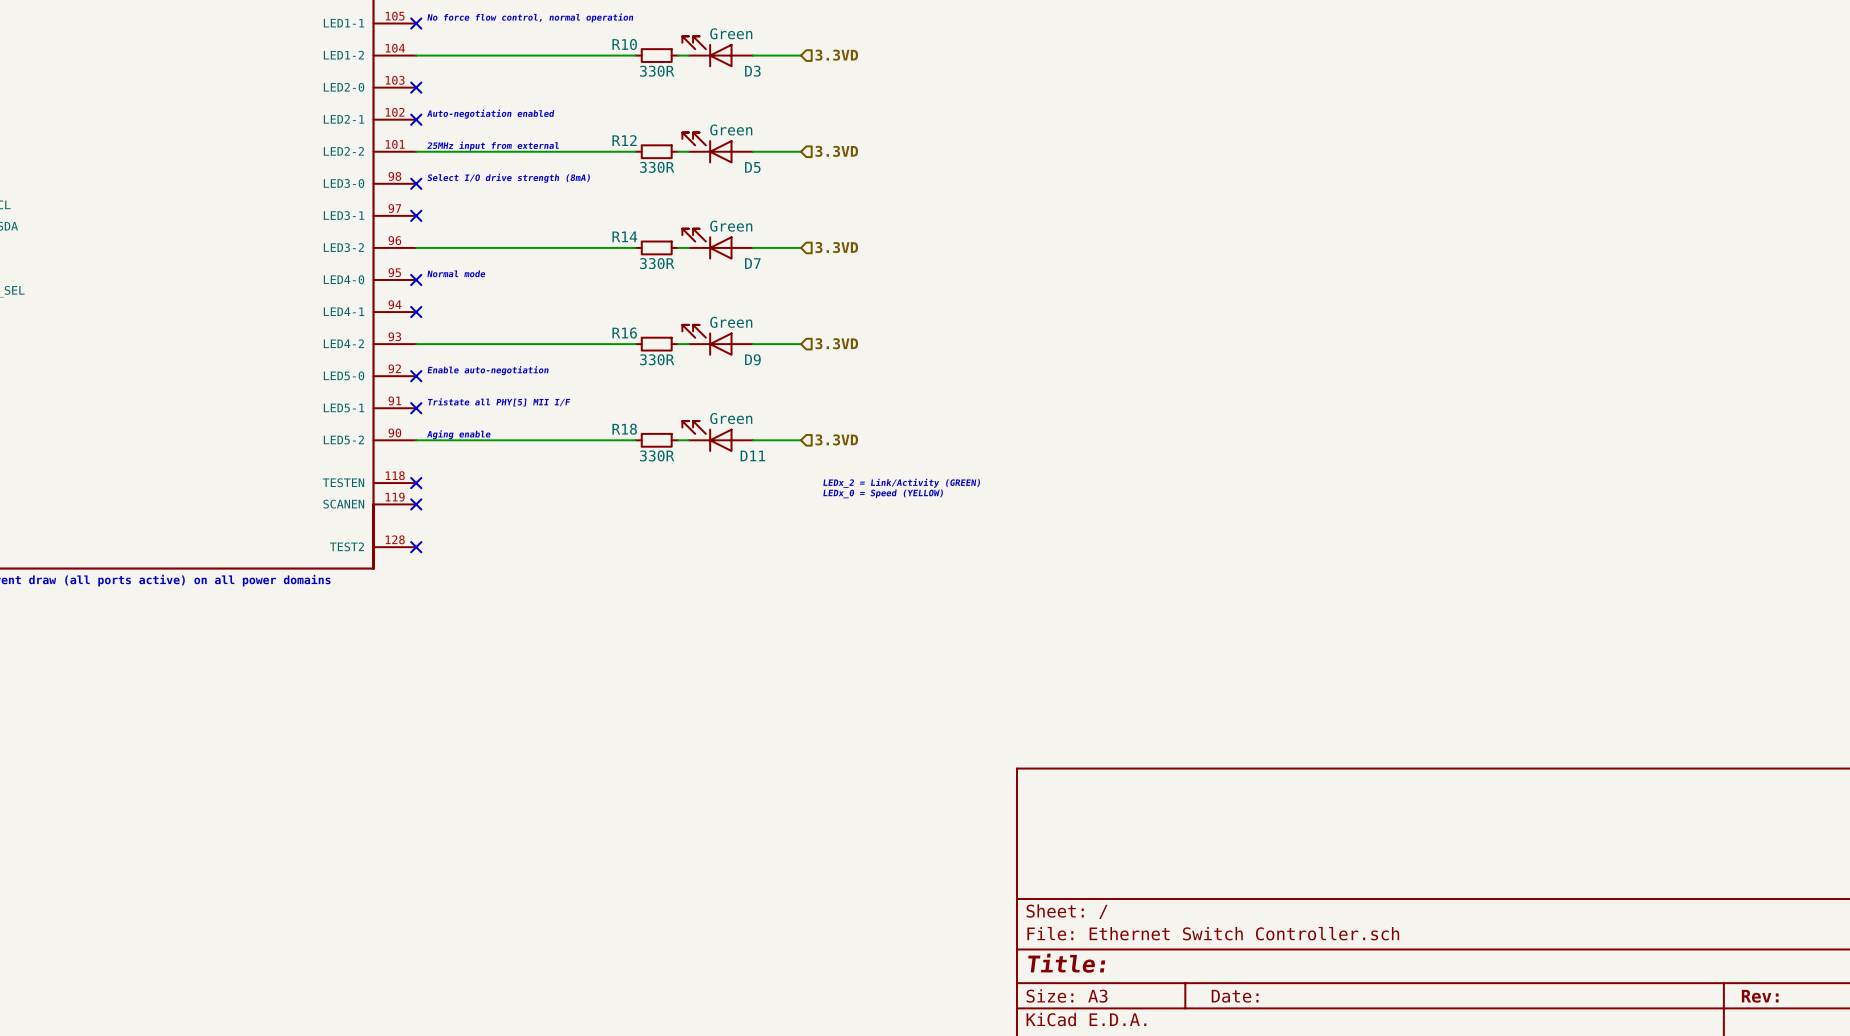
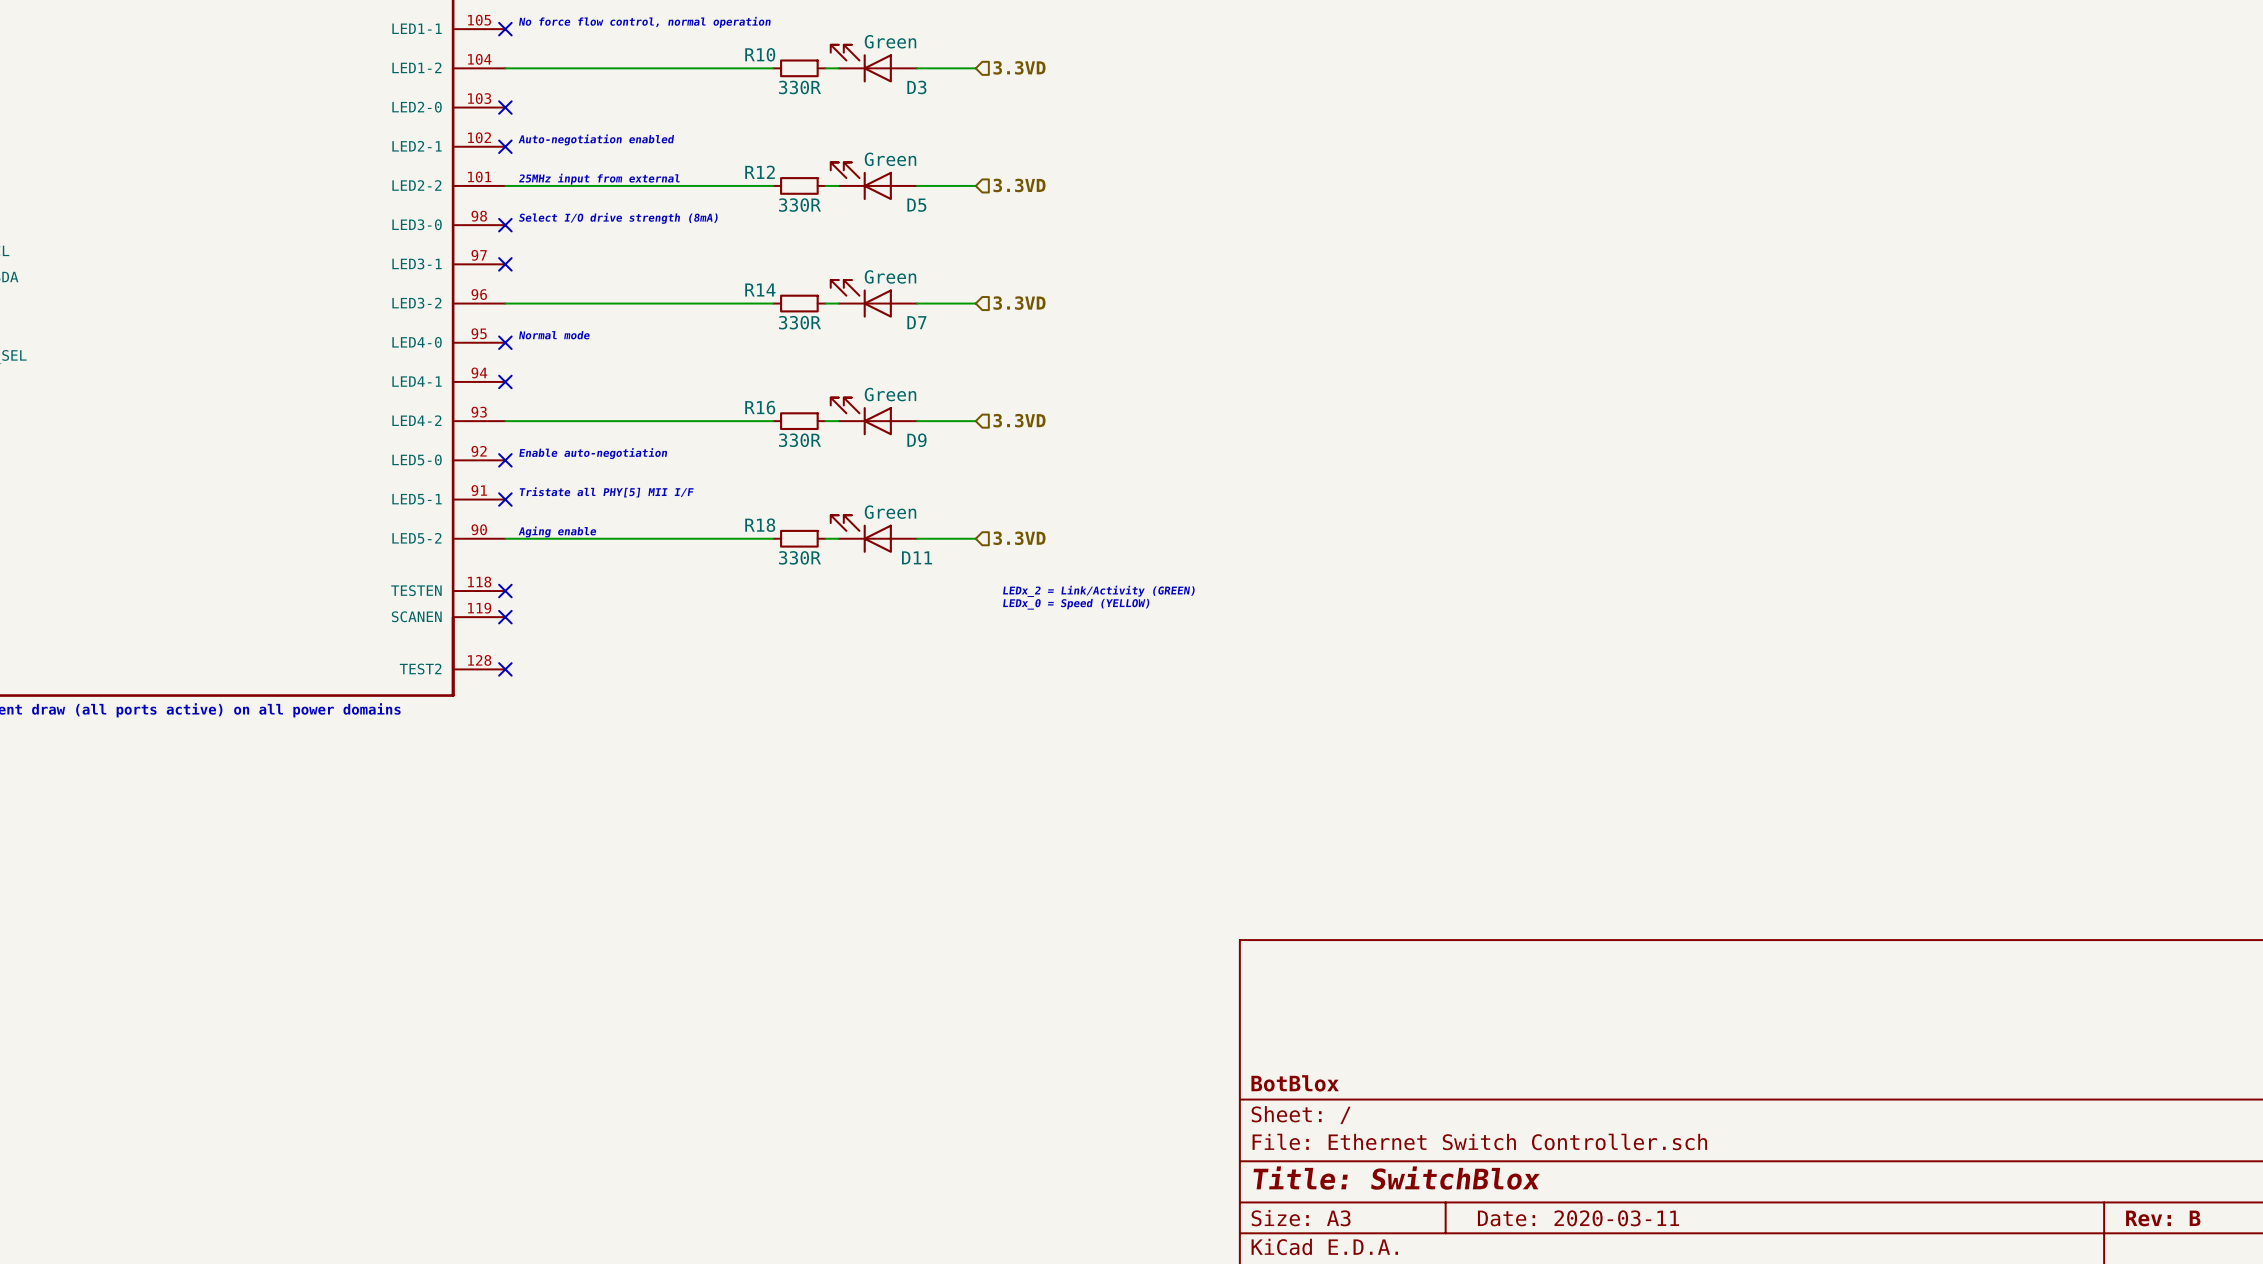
title block: none -> BotBlox (1295, 1083)
title block: Title: (1066, 963) -> Title: SwitchBlox (1396, 1178)
title block: Date: (1235, 996) -> Date: 2020-03-11 (1578, 1218)
title block: Rev: (1760, 996) -> Rev: B (2163, 1218)

